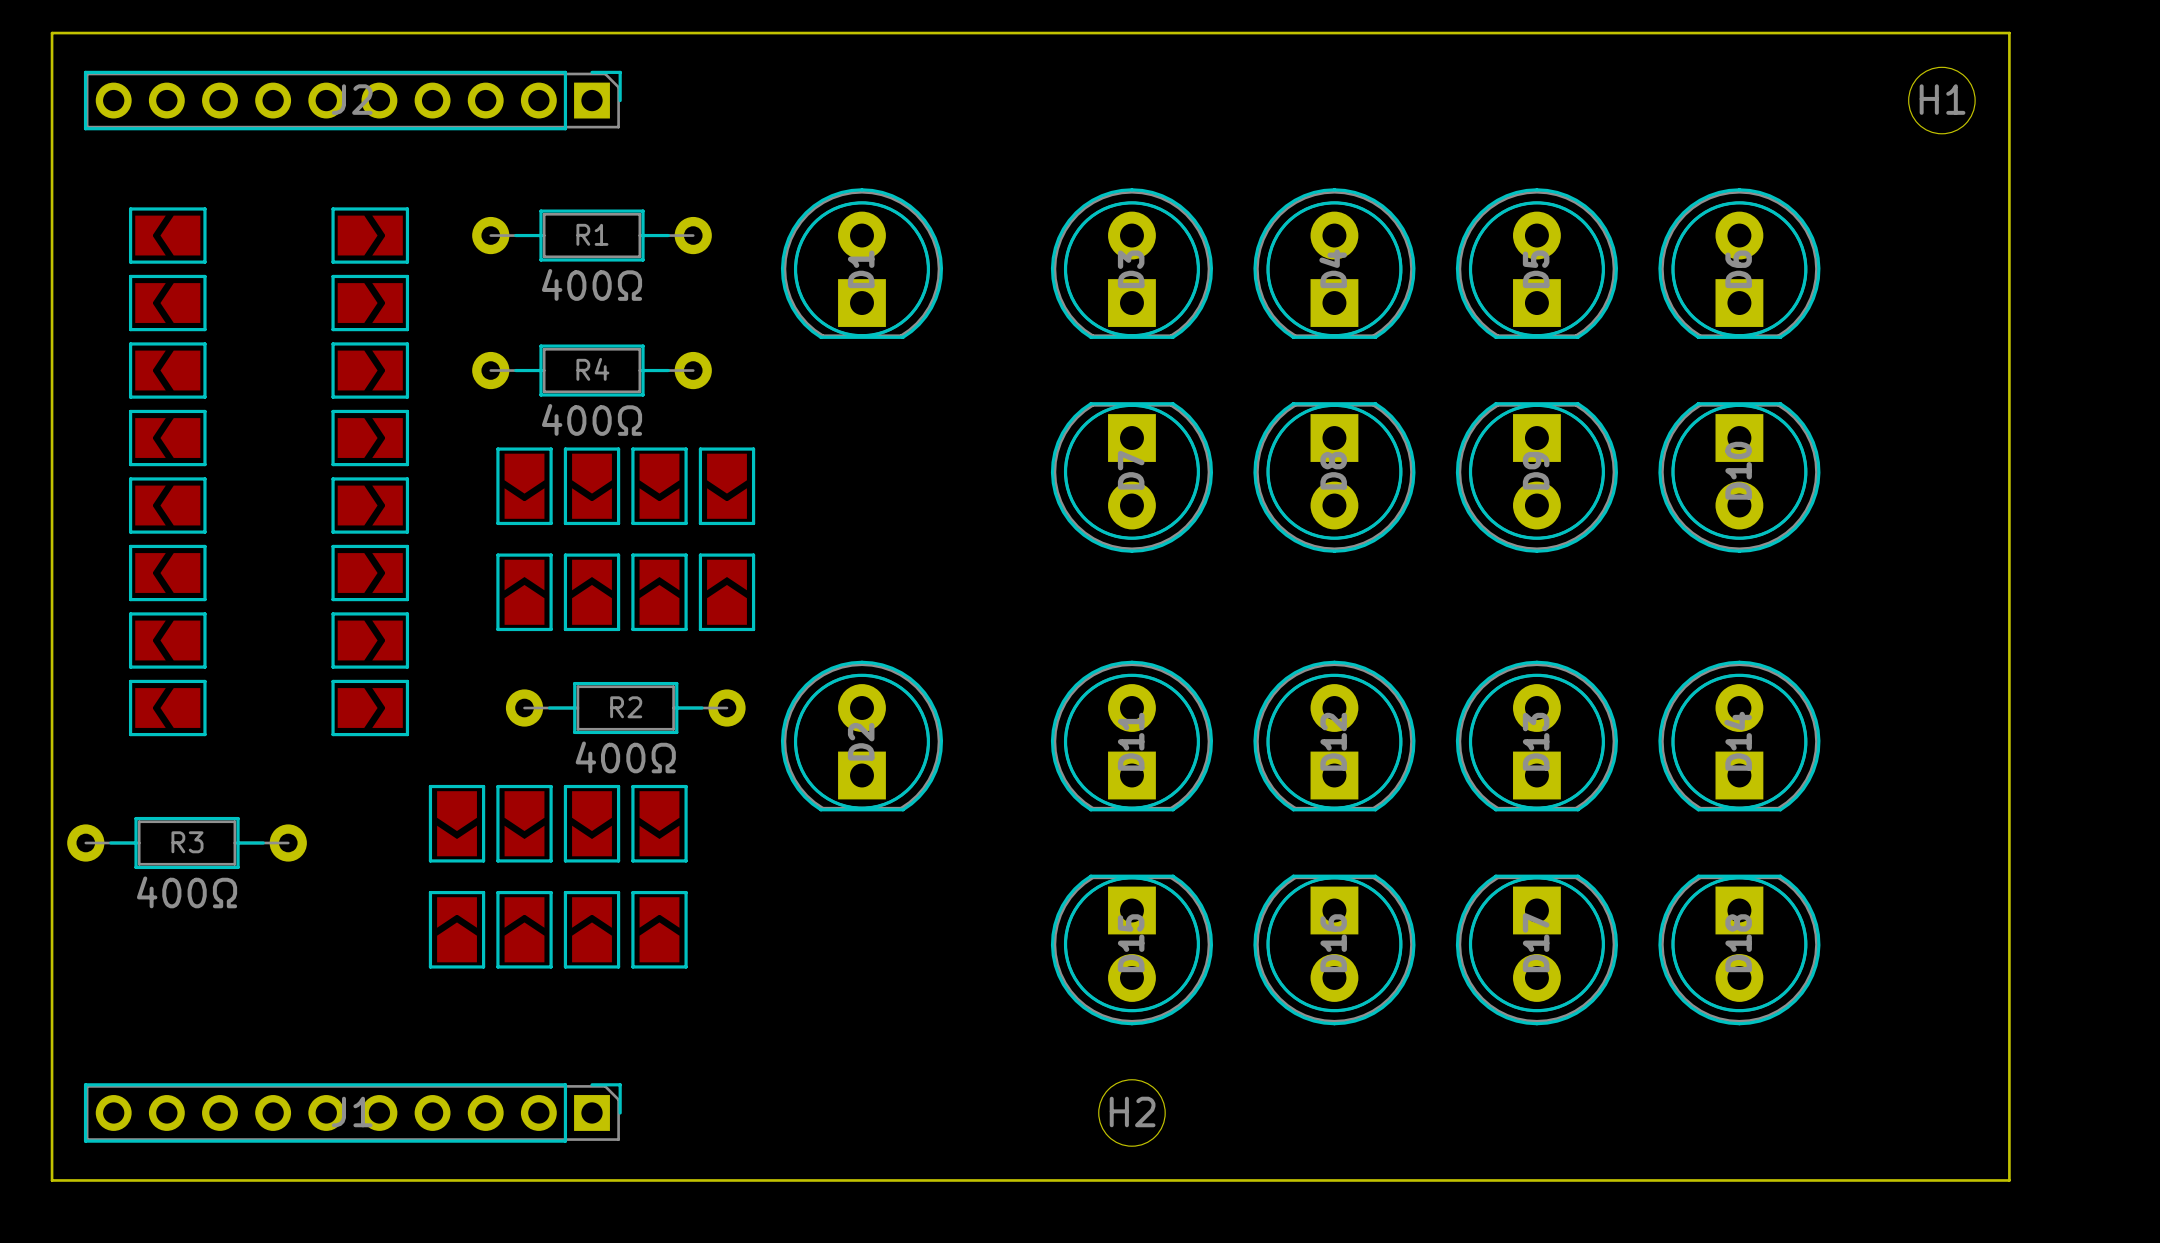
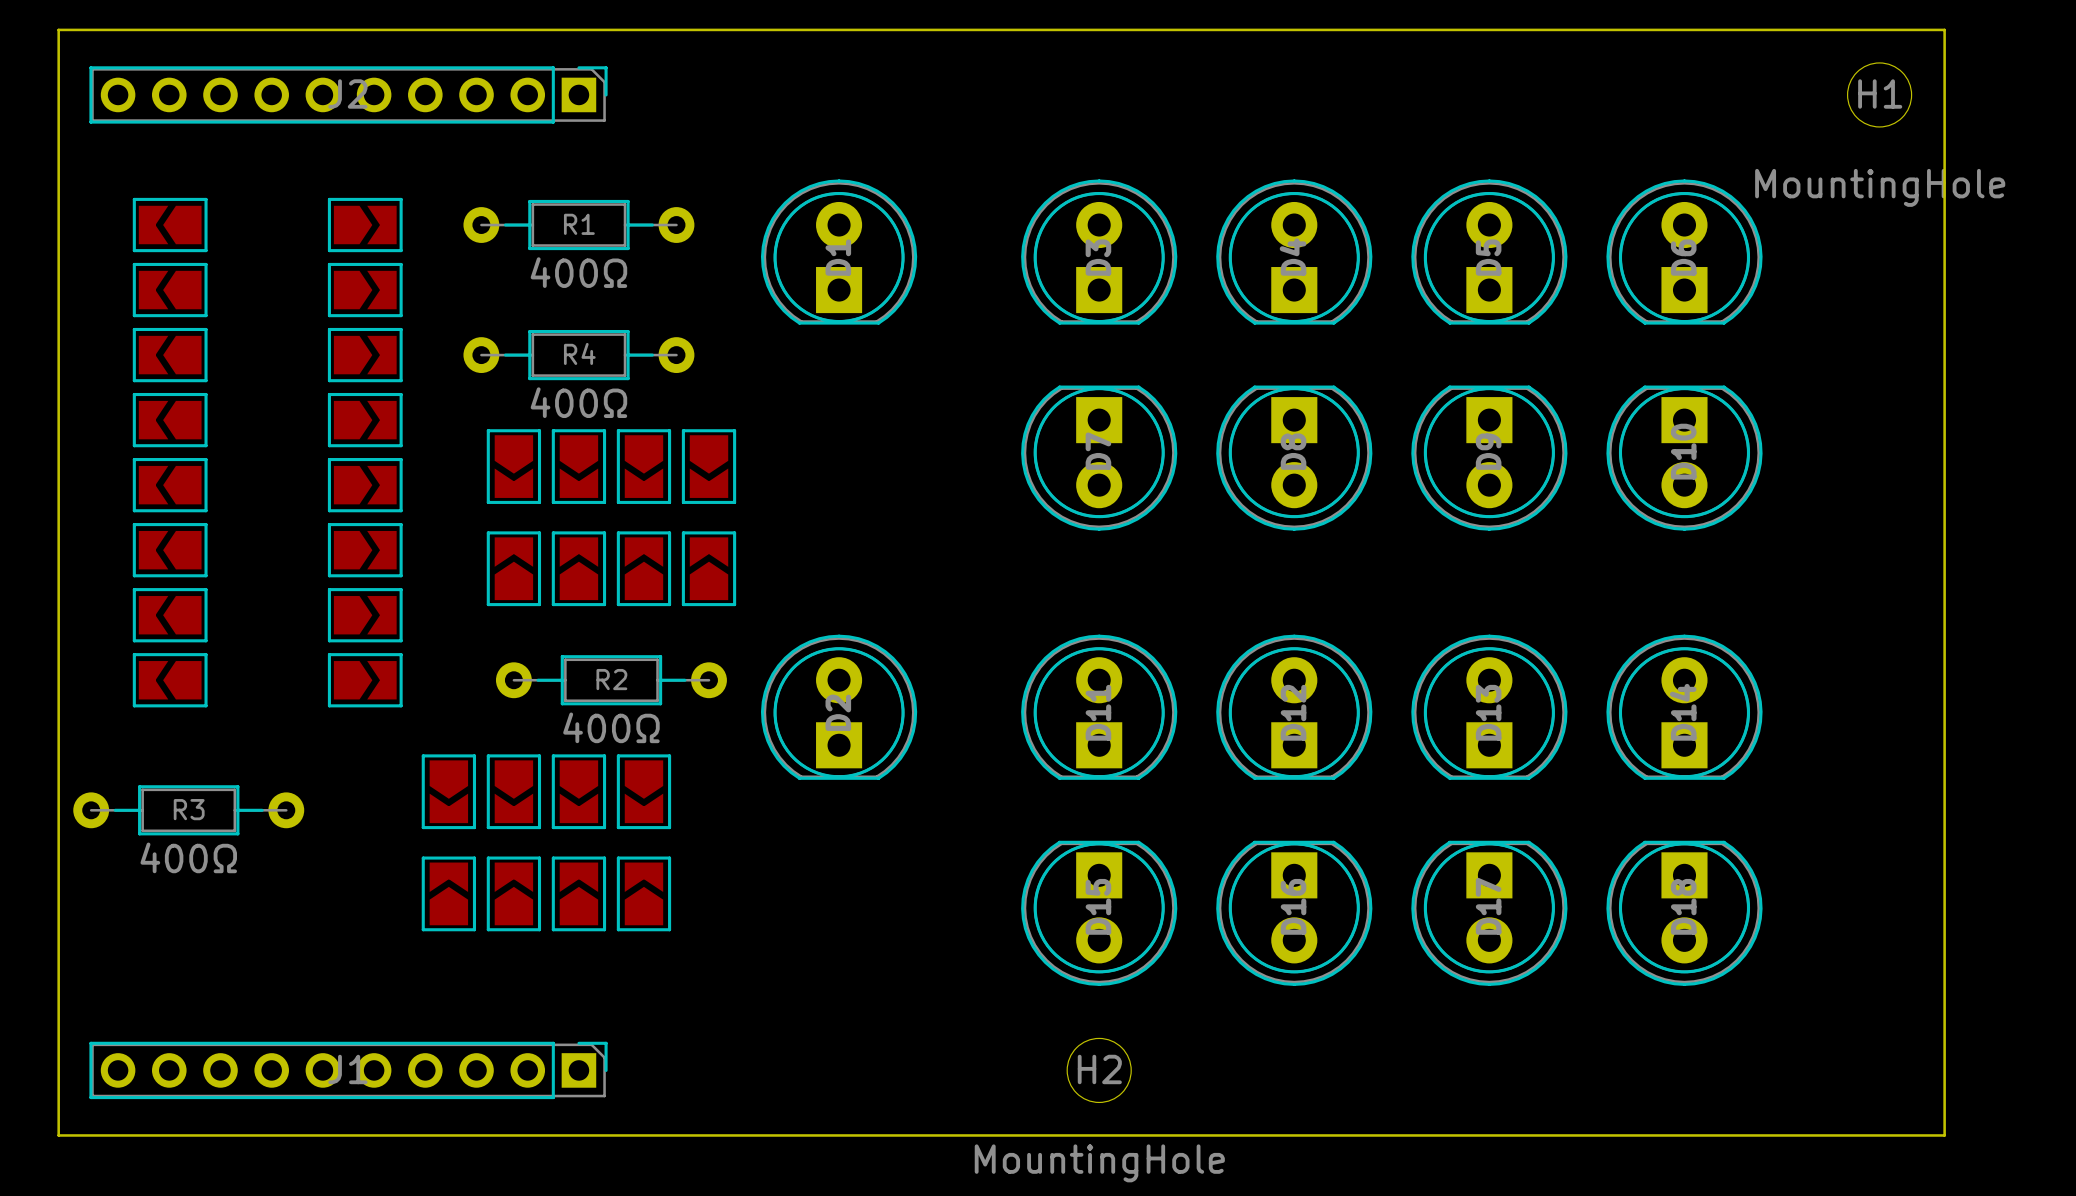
H1 value: none -> MountingHole (1880, 187)
H2 value: none -> MountingHole (1099, 1163)

